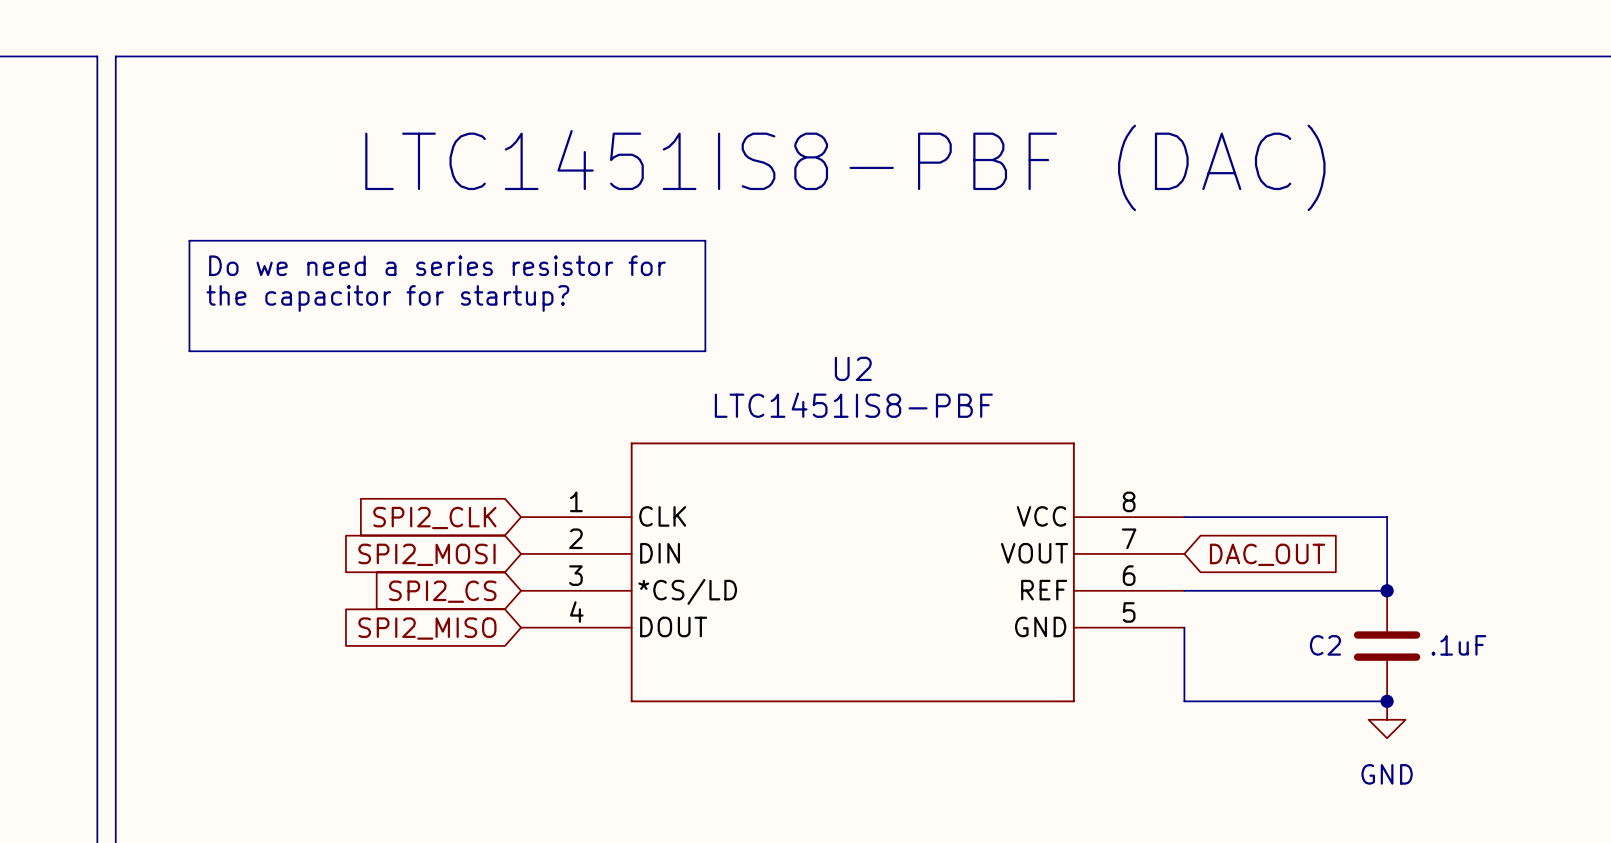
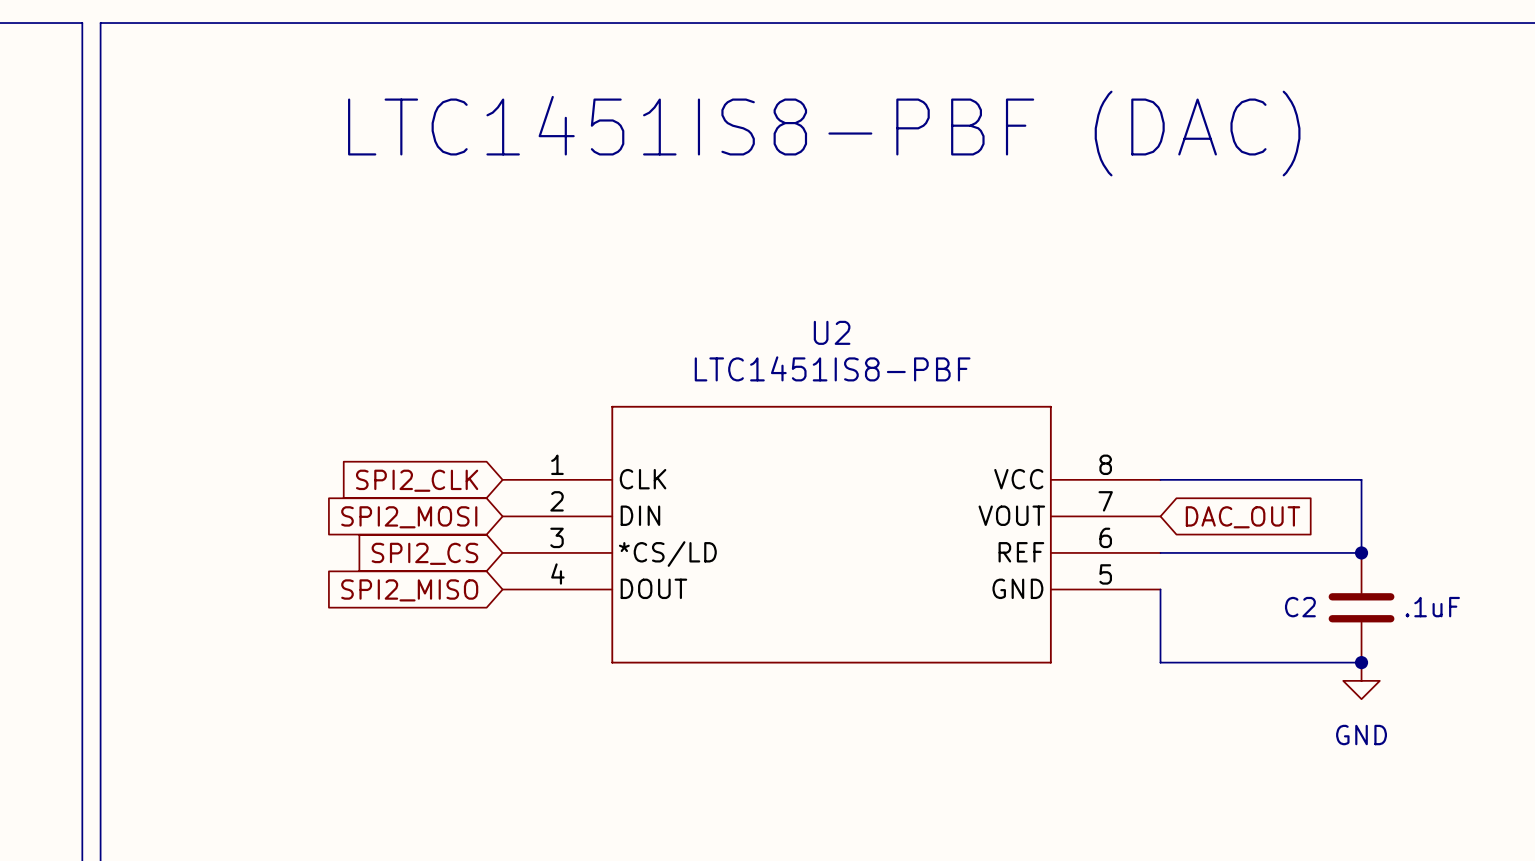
line: (189, 240) (705, 240) (705, 351) (189, 351) (189, 240) -> none
text: Do we need a series resistor for (437, 265) -> none
text: the capacitor for startup? (387, 298) -> none

